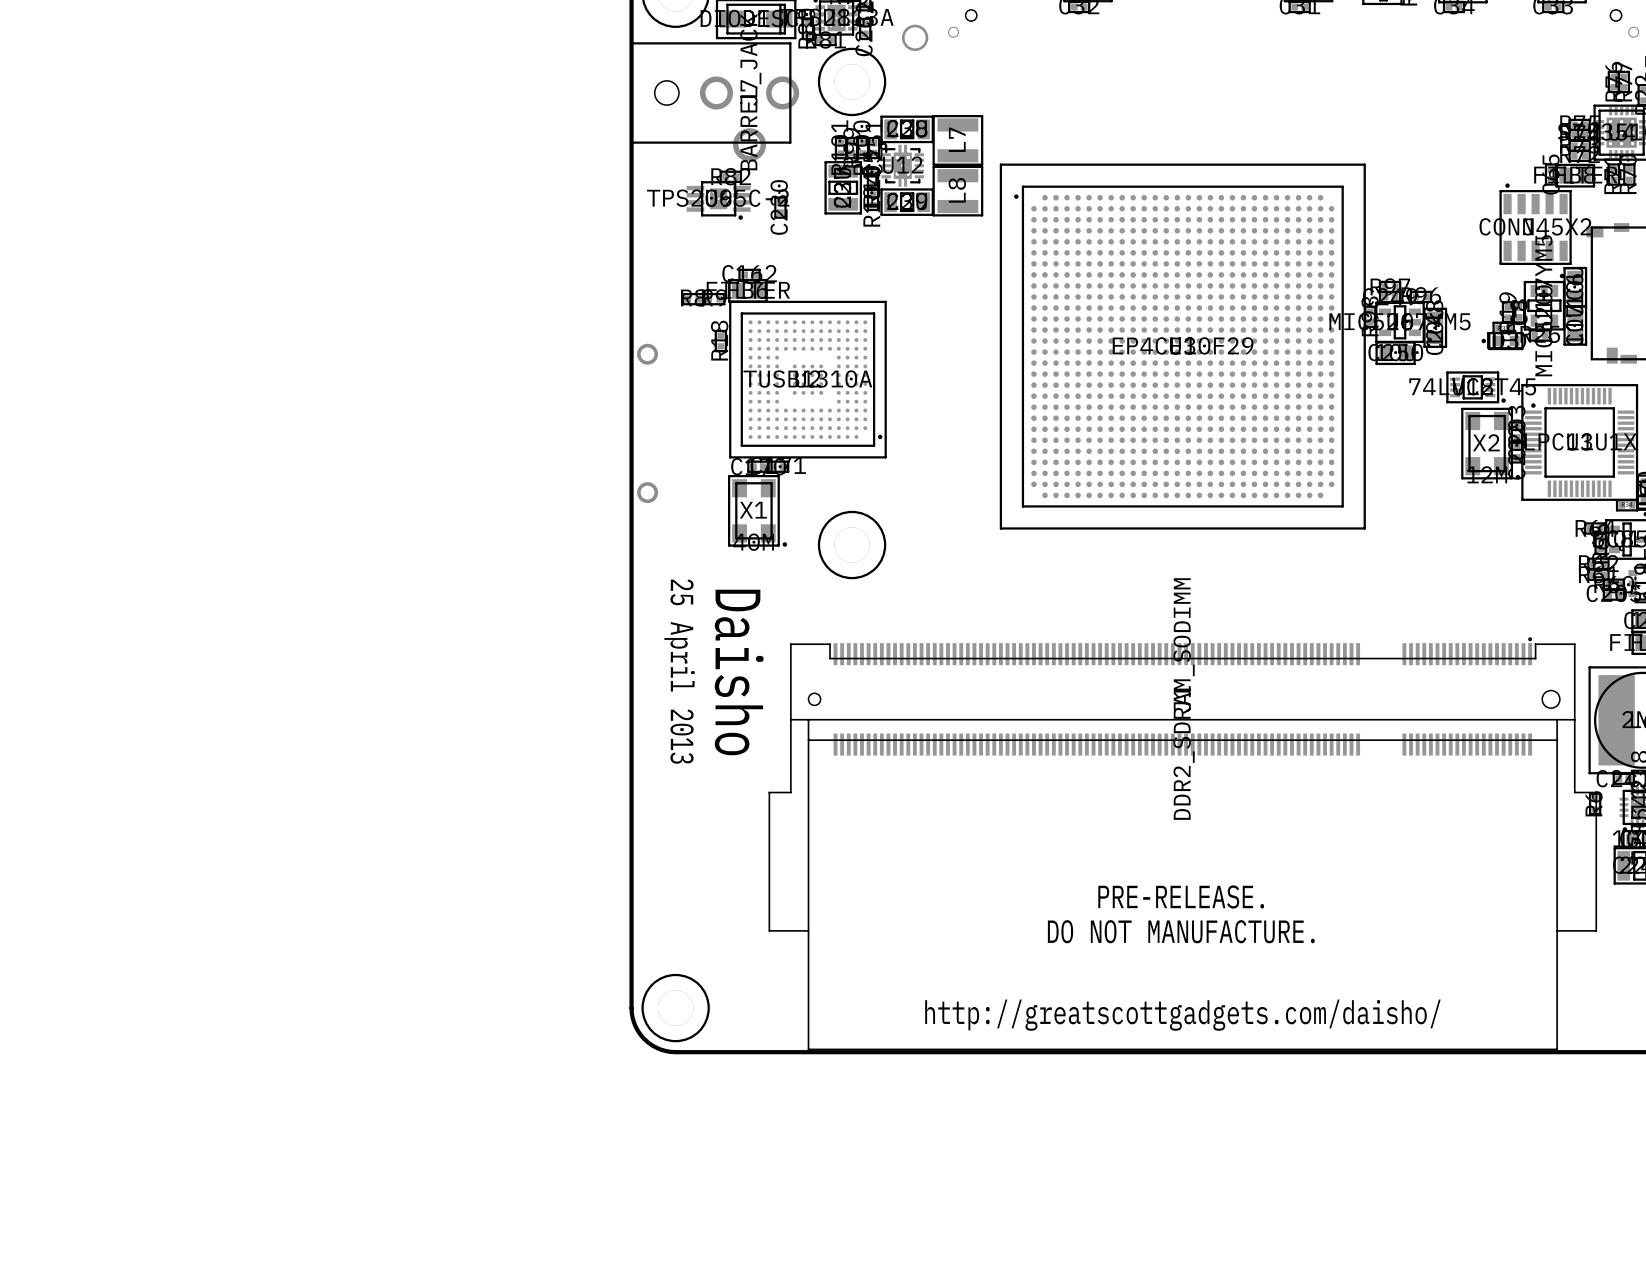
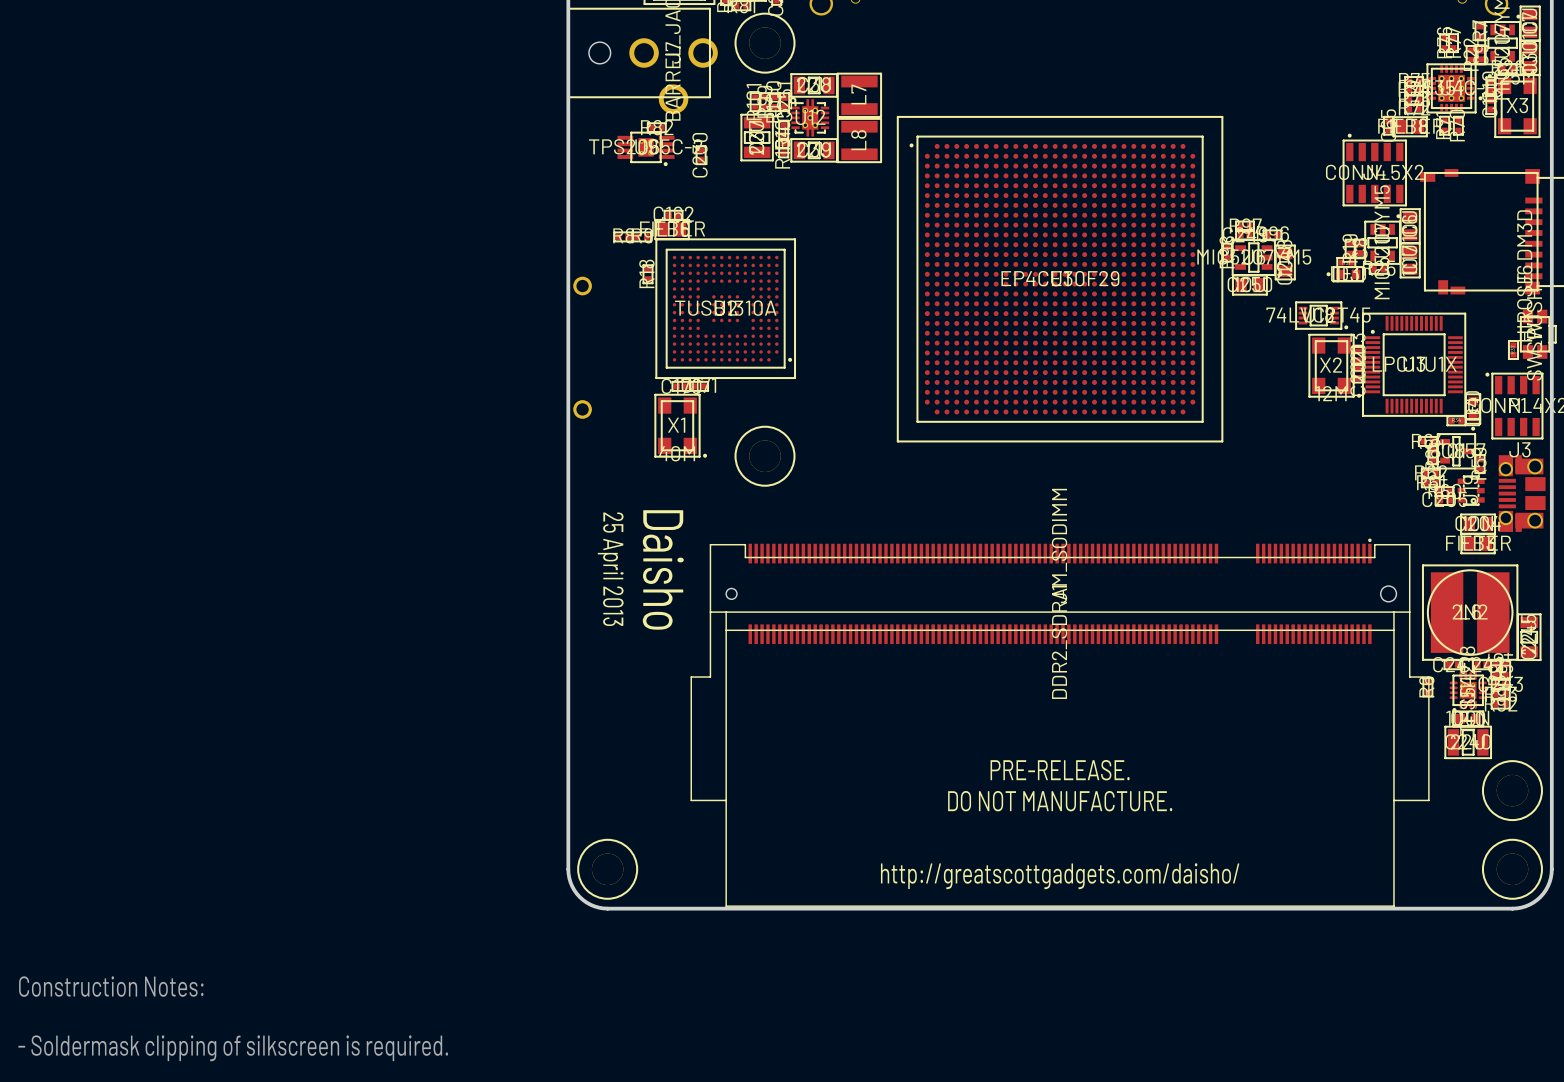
text: none -> Construction Notes: (111, 986)
text: none -> - Soldermask clipping of silkscreen is required. (233, 1048)

